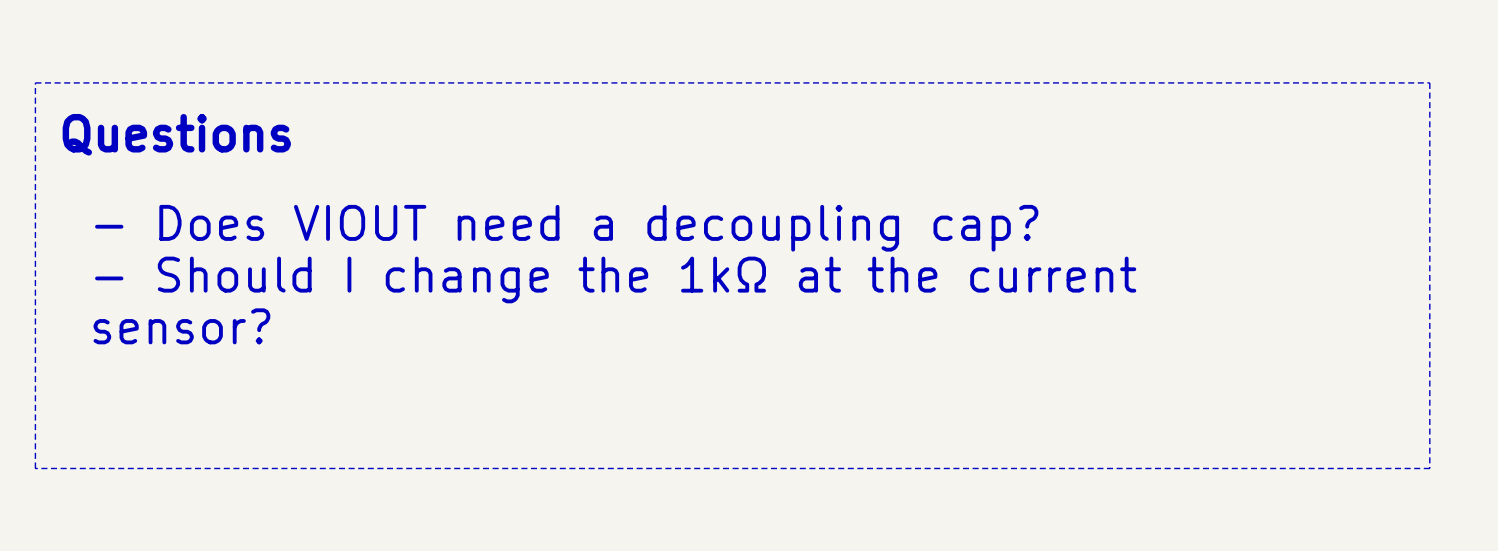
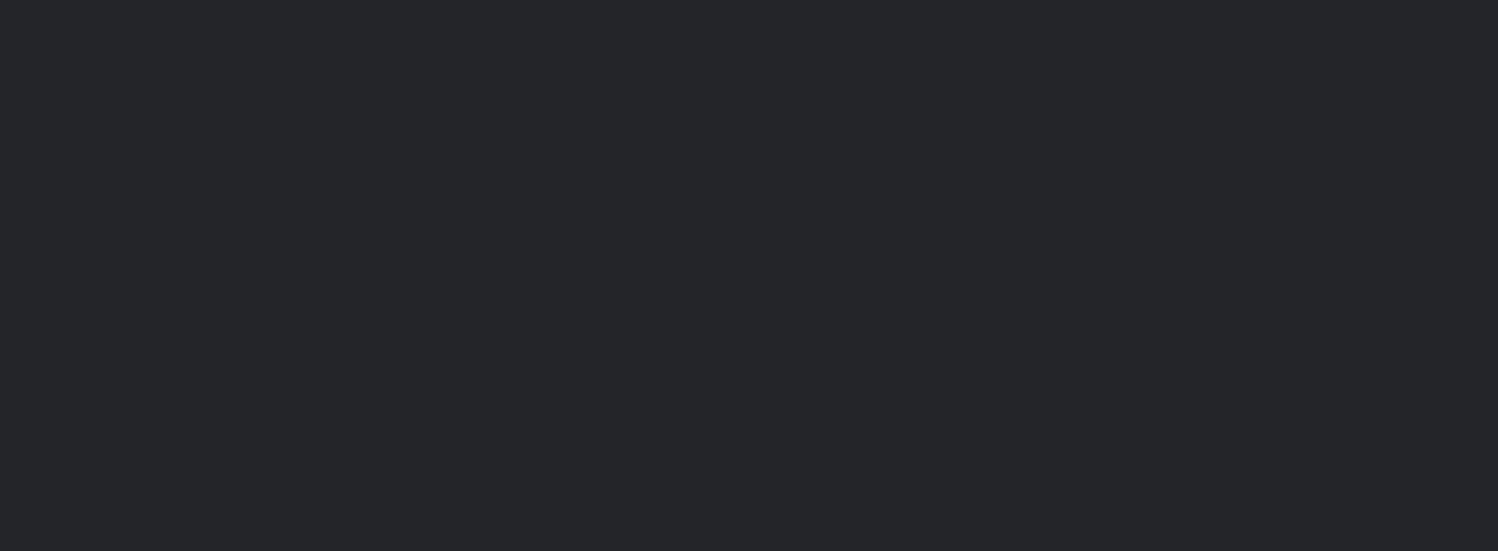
line: (35, 82) (1429, 82) (1429, 468) (35, 468) (35, 82) -> none
text: Questions (176, 134) -> none
text: - Does VIOUT need a decoupling cap? (566, 228) -> none
text: - Should I change the 1kΩ at the current (615, 279) -> none
text: sensor? (181, 326) -> none

